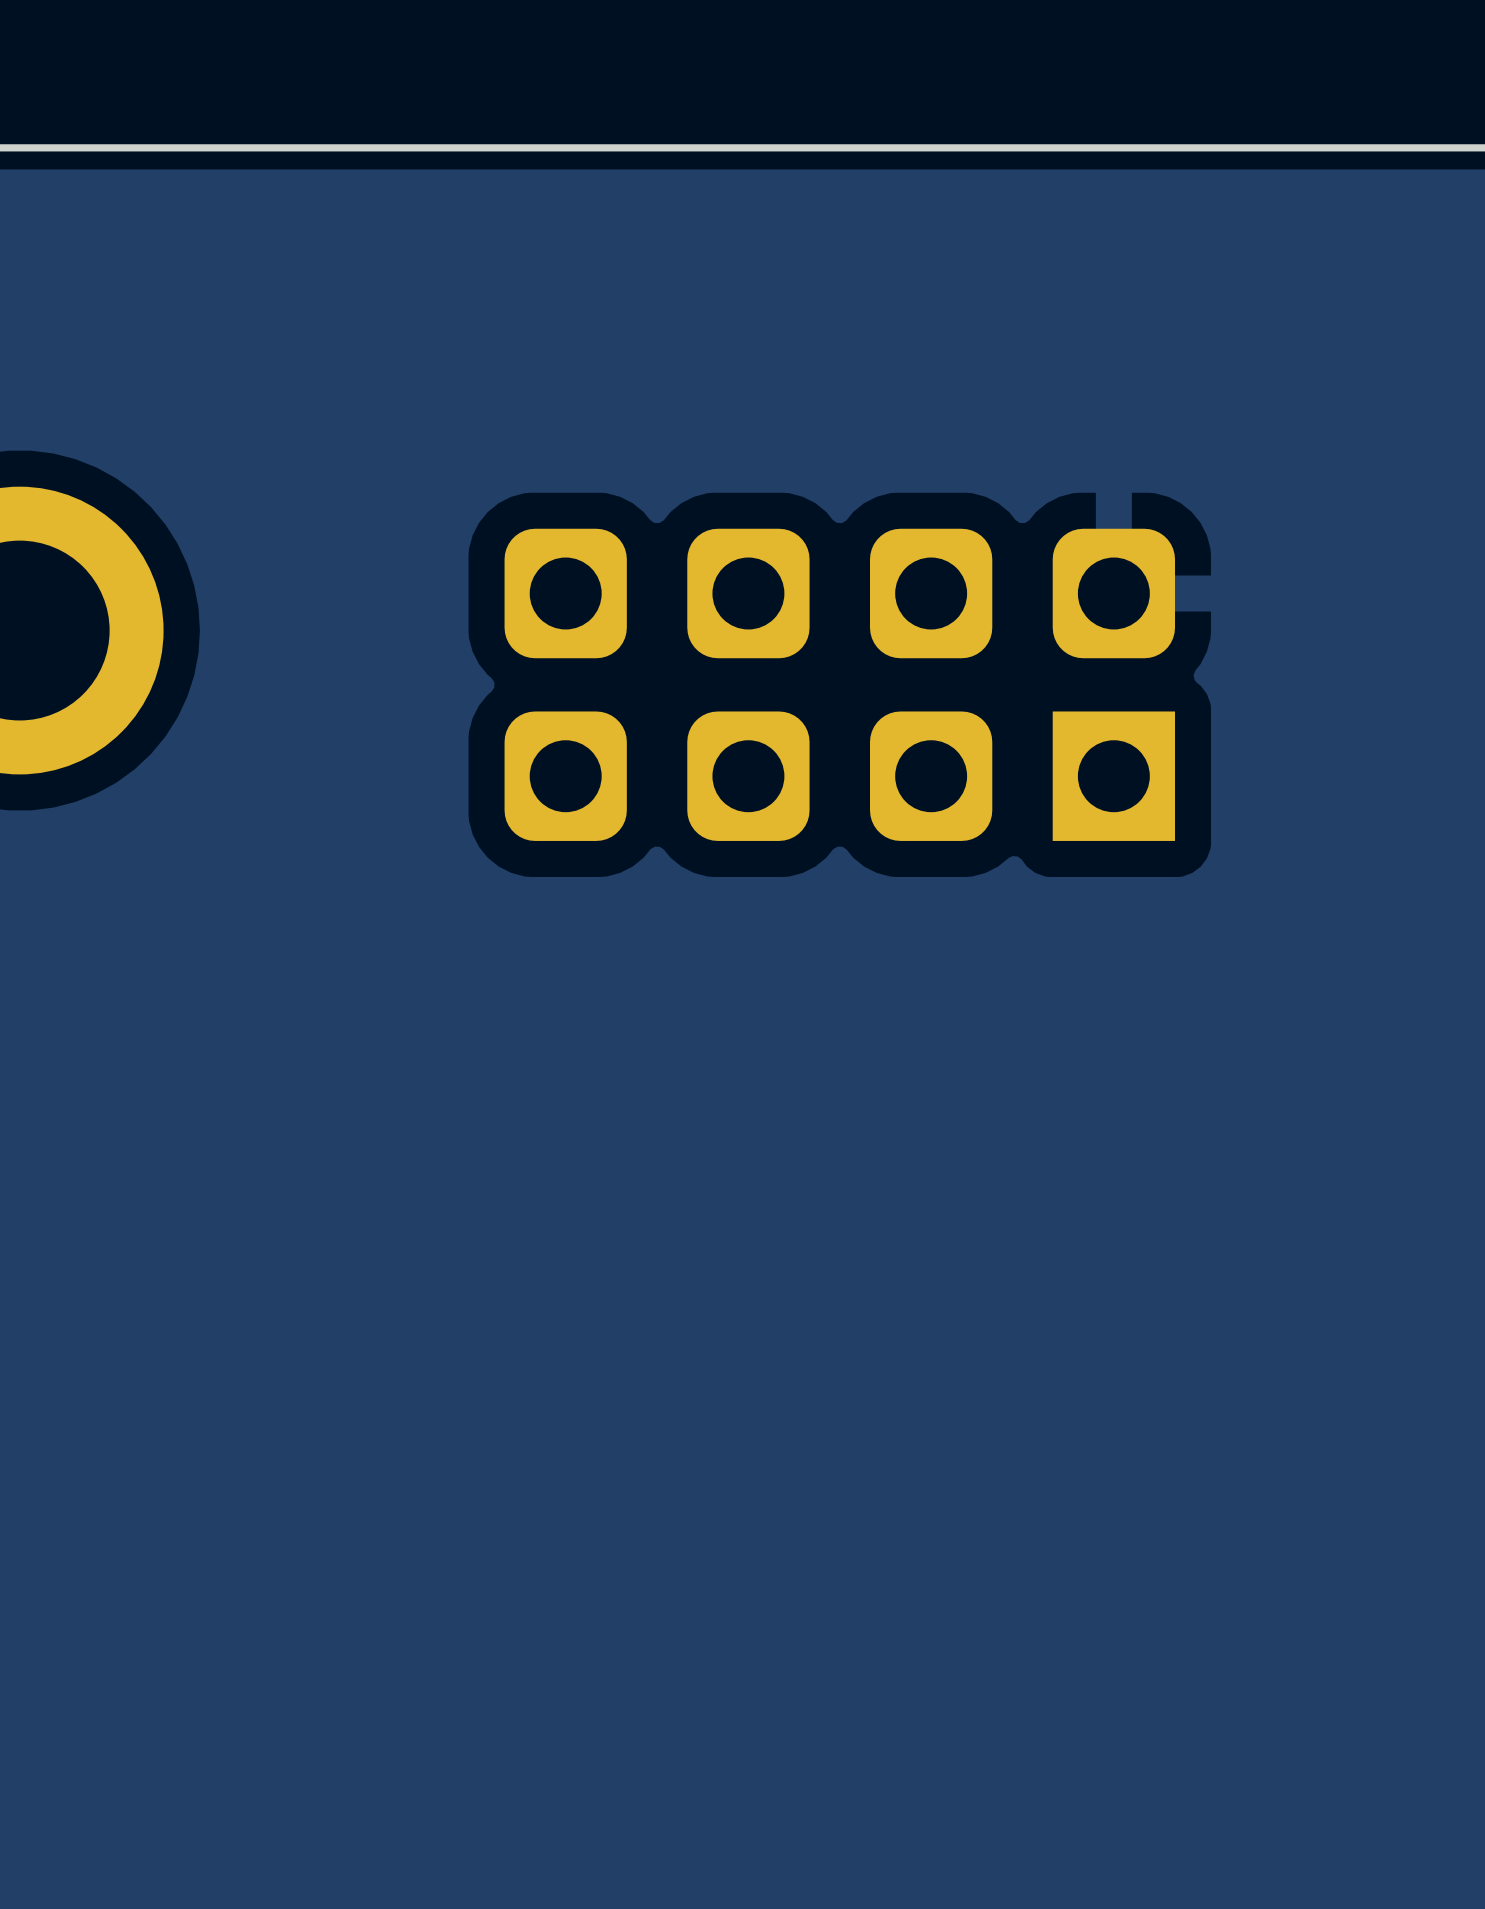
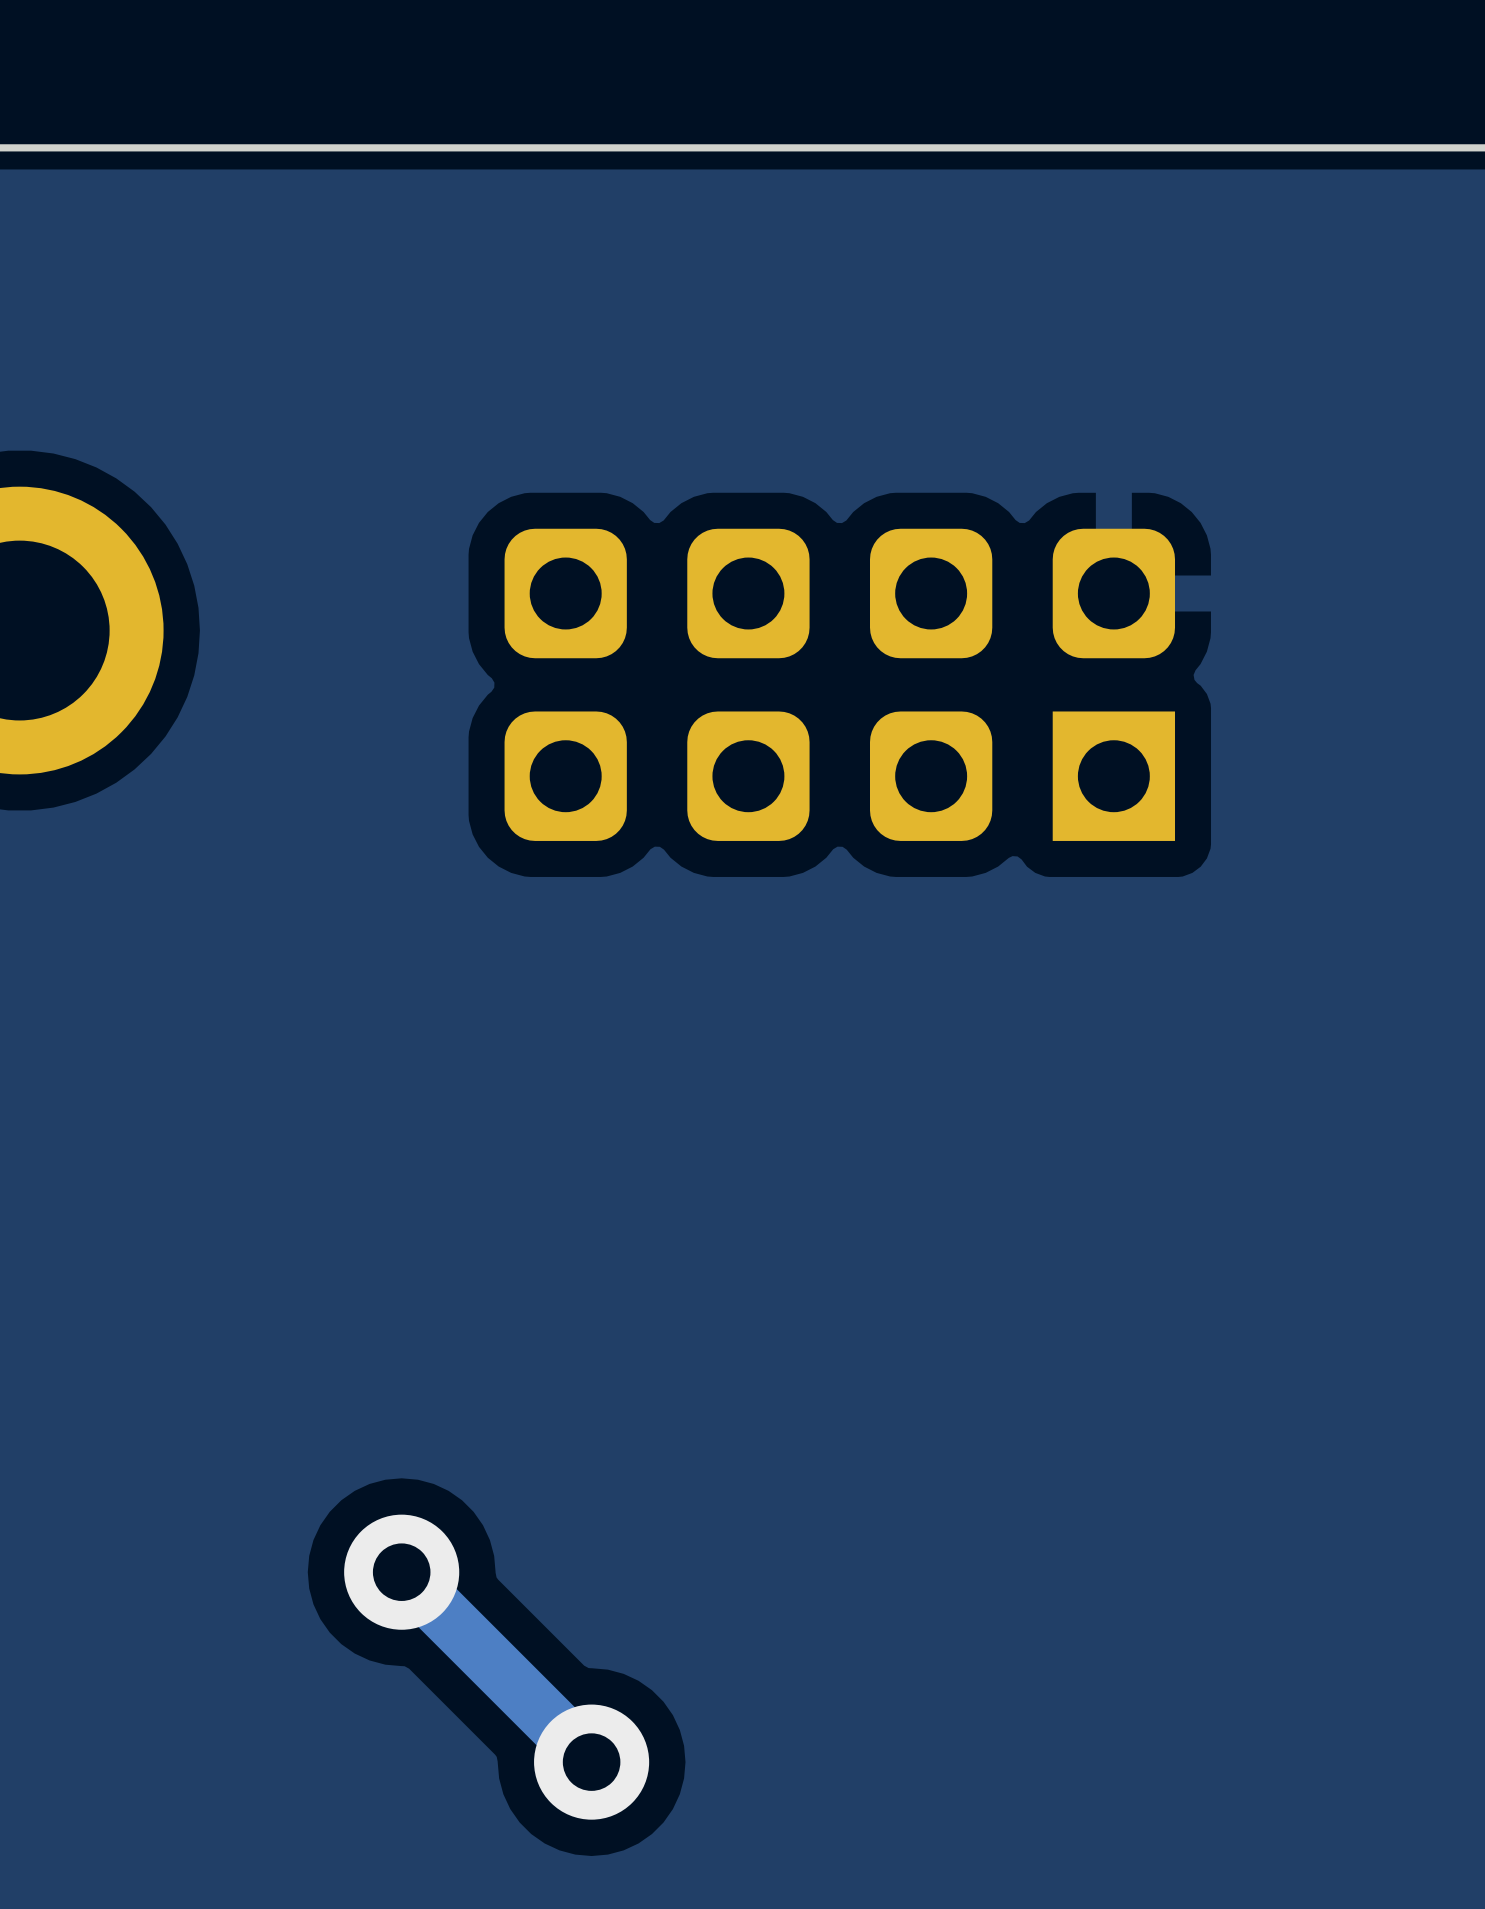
track: none -> (401, 1572) (591, 1762)
via: none -> (401, 1572)
via: none -> (591, 1762)

